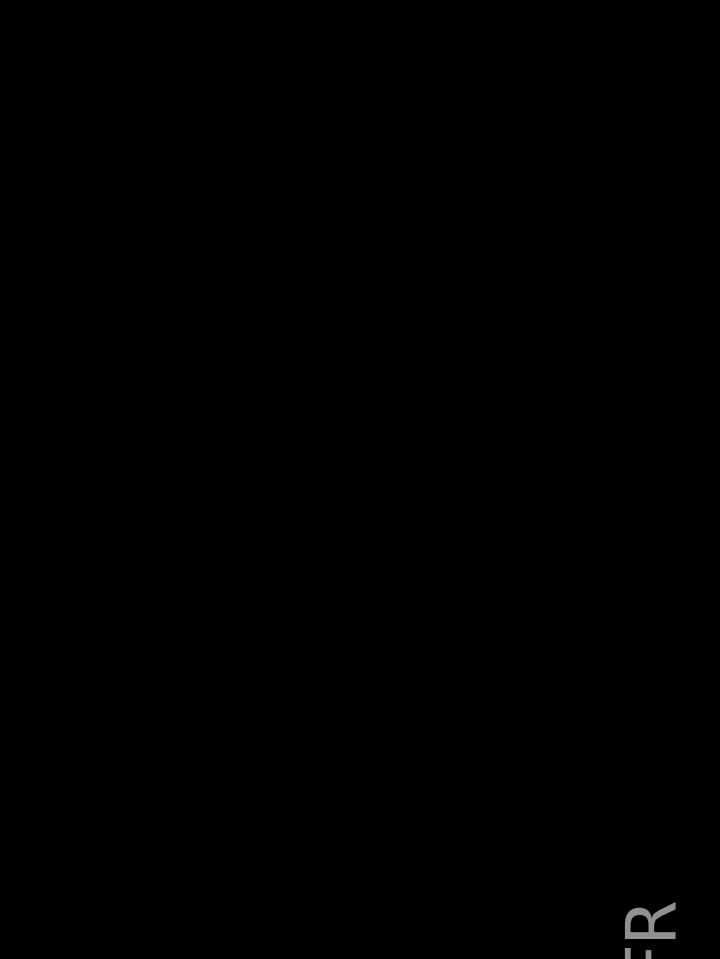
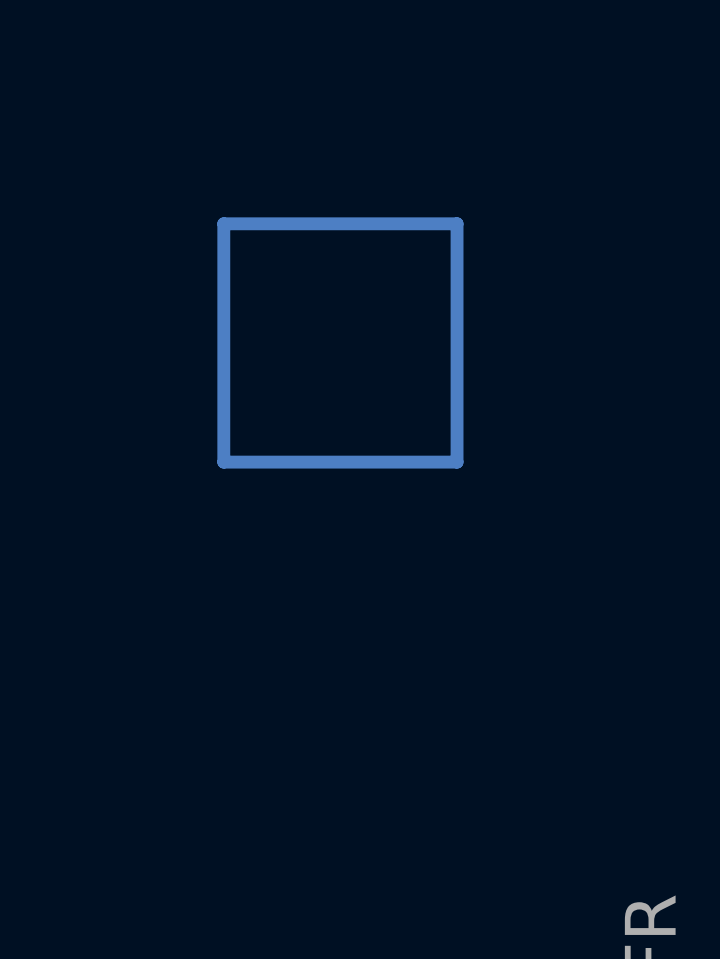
bottom track: none -> (223, 223) (457, 223) (457, 462) (223, 462) (223, 223)

